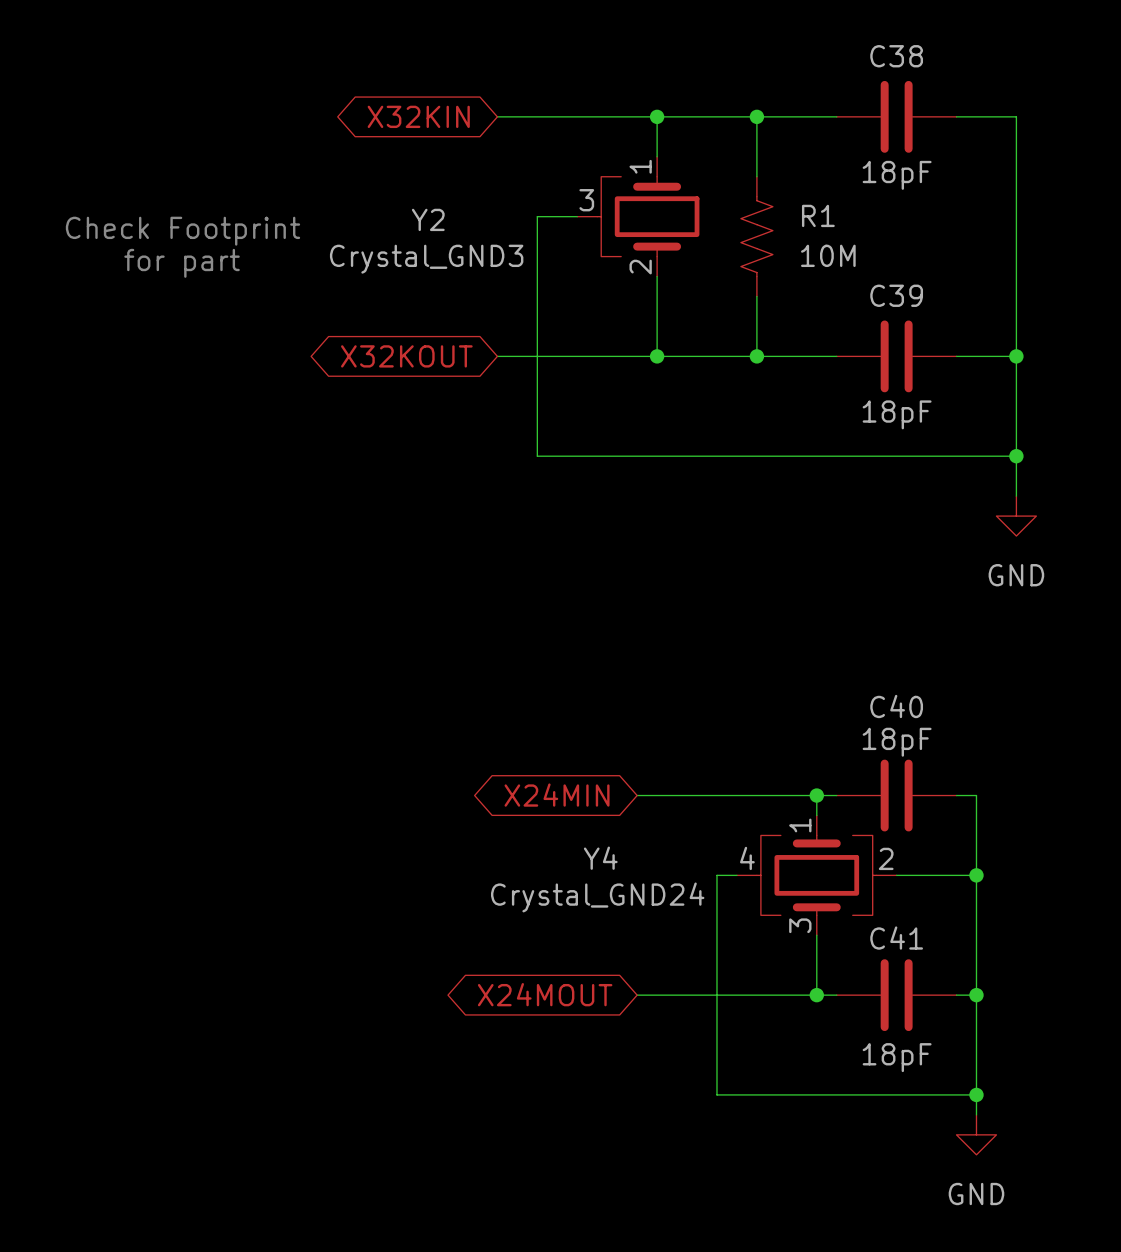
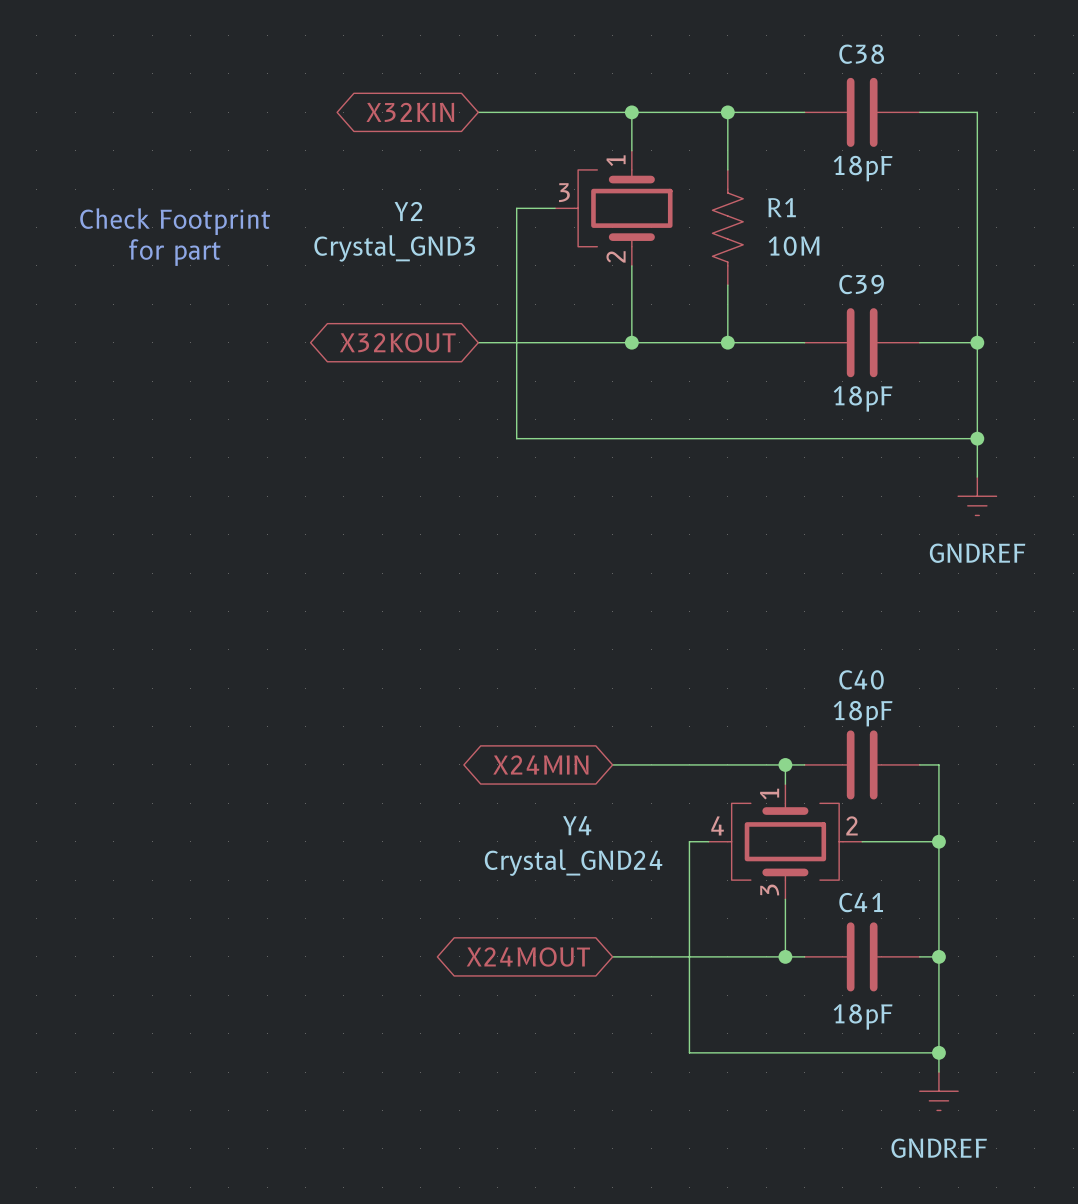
power symbol: GND (1016, 516) -> GNDREF (977, 496)
power symbol: GND (976, 1134) -> GNDREF (938, 1091)

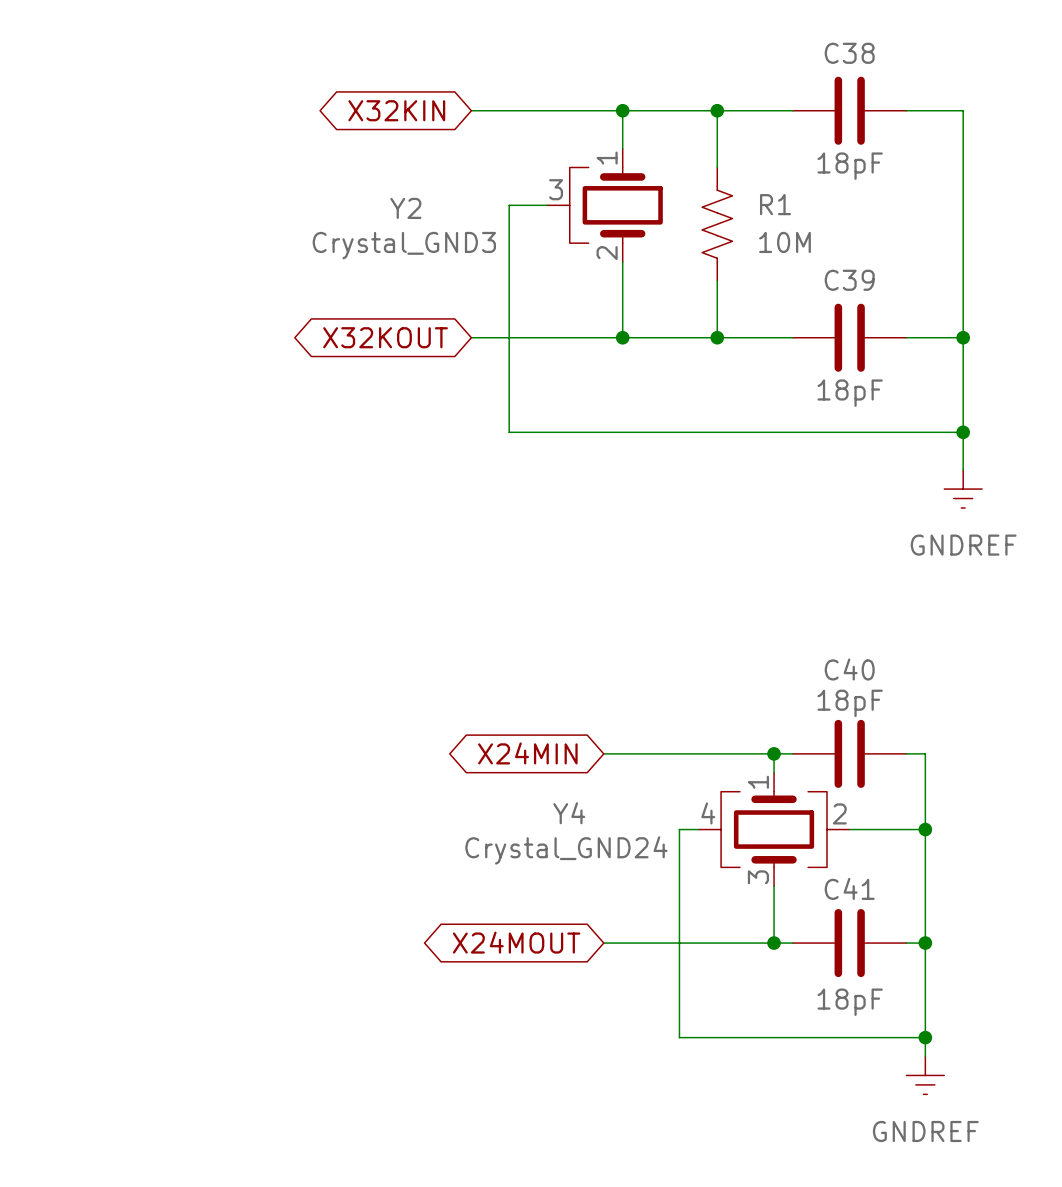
text: Check Footprint (175, 221) -> none
text: for part (174, 252) -> none

